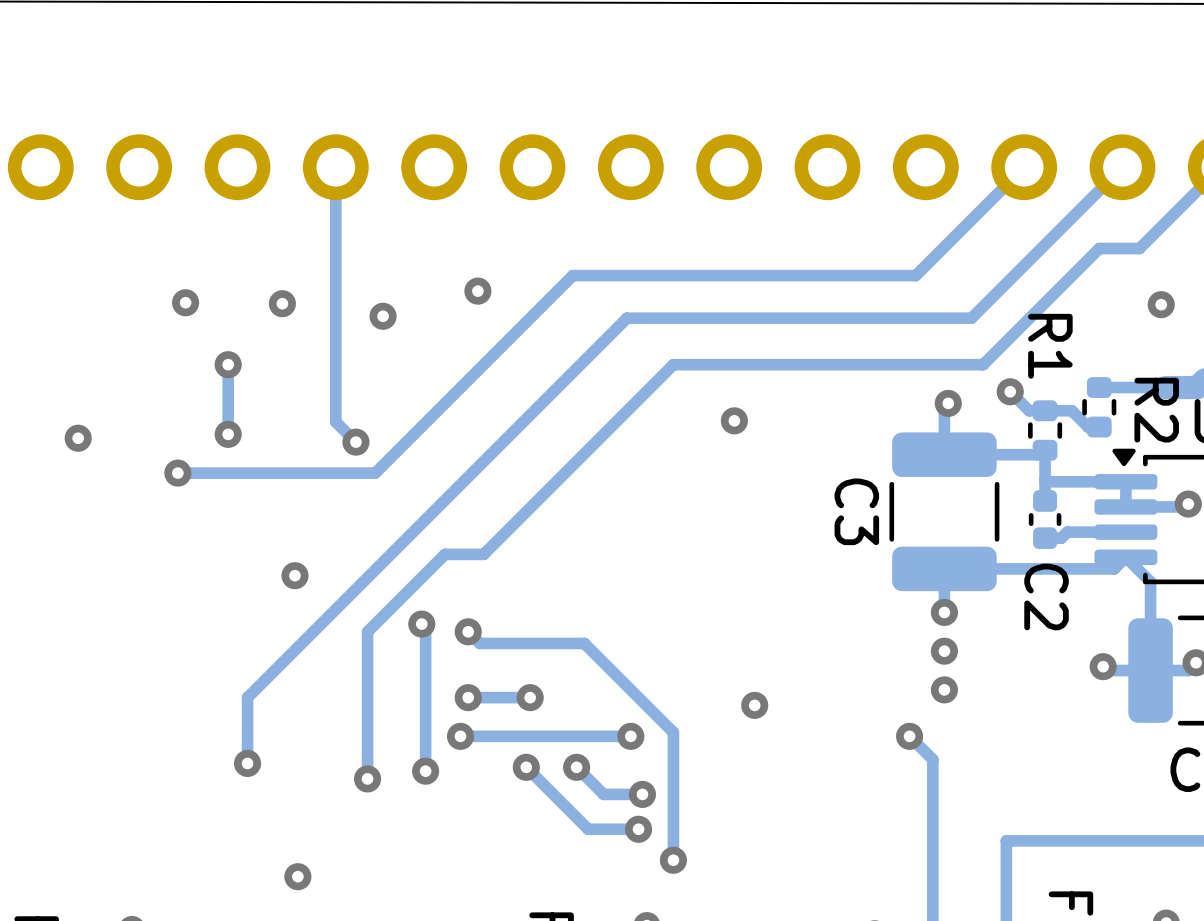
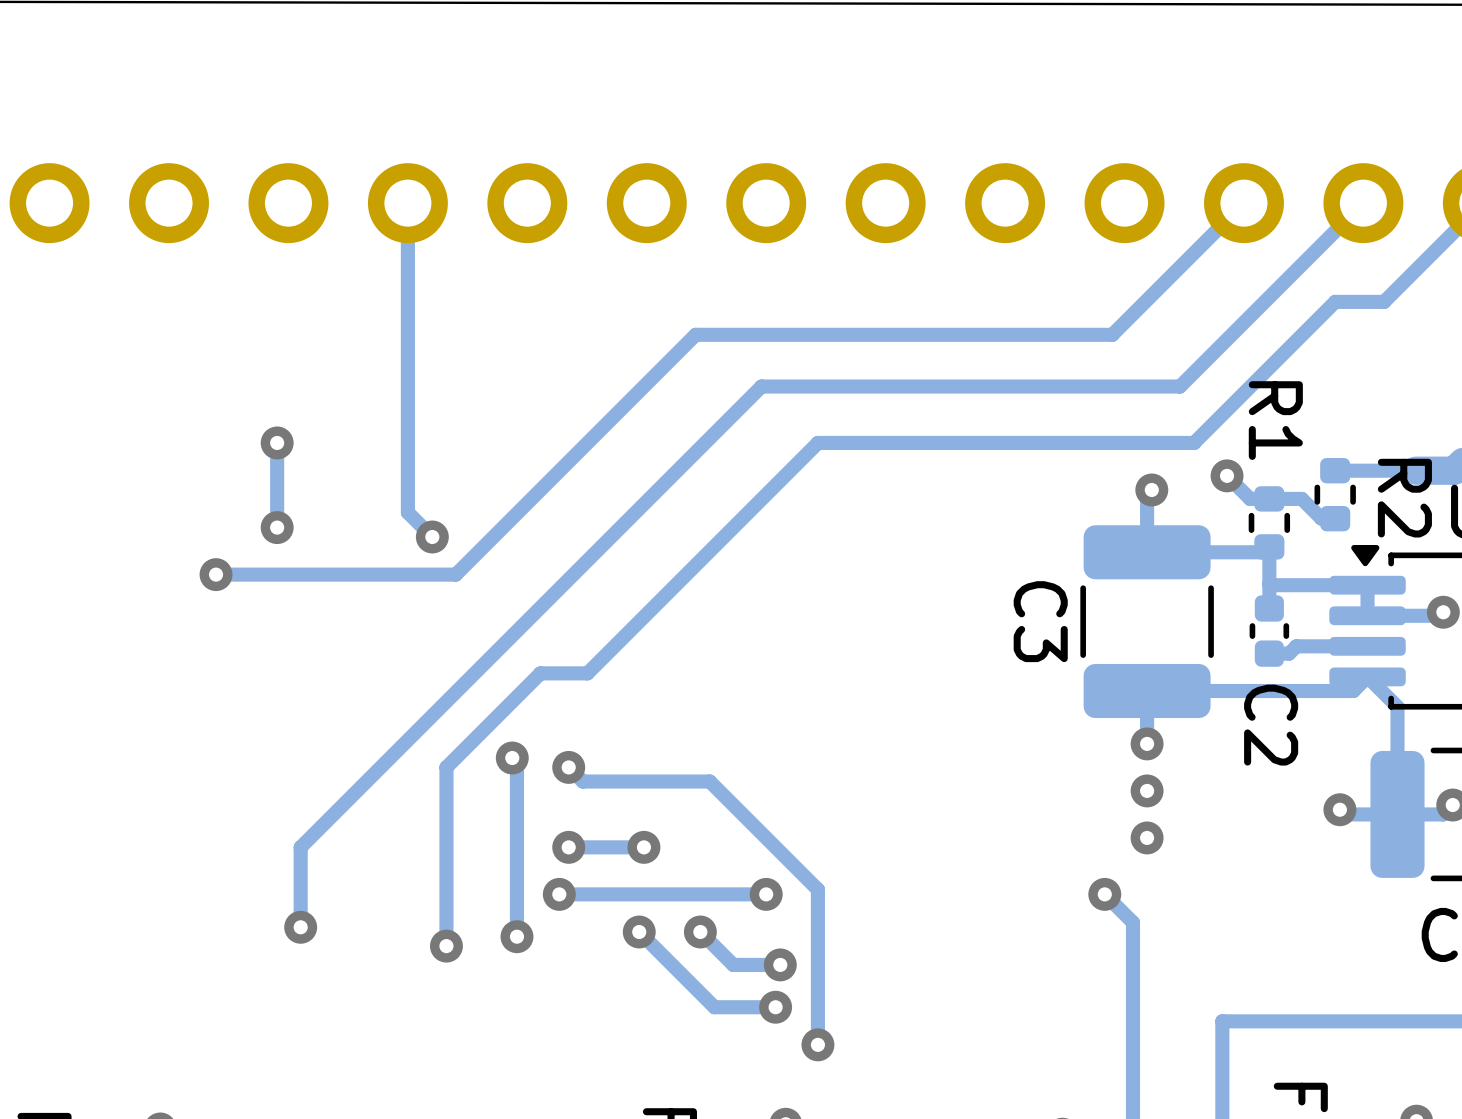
via: (477, 291) -> none
via: (185, 302) -> none
via: (282, 303) -> none
via: (1161, 304) -> none
via: (383, 316) -> none
via: (734, 420) -> none
via: (78, 438) -> none
via: (294, 575) -> none
via: (754, 705) -> none
via: (297, 876) -> none

